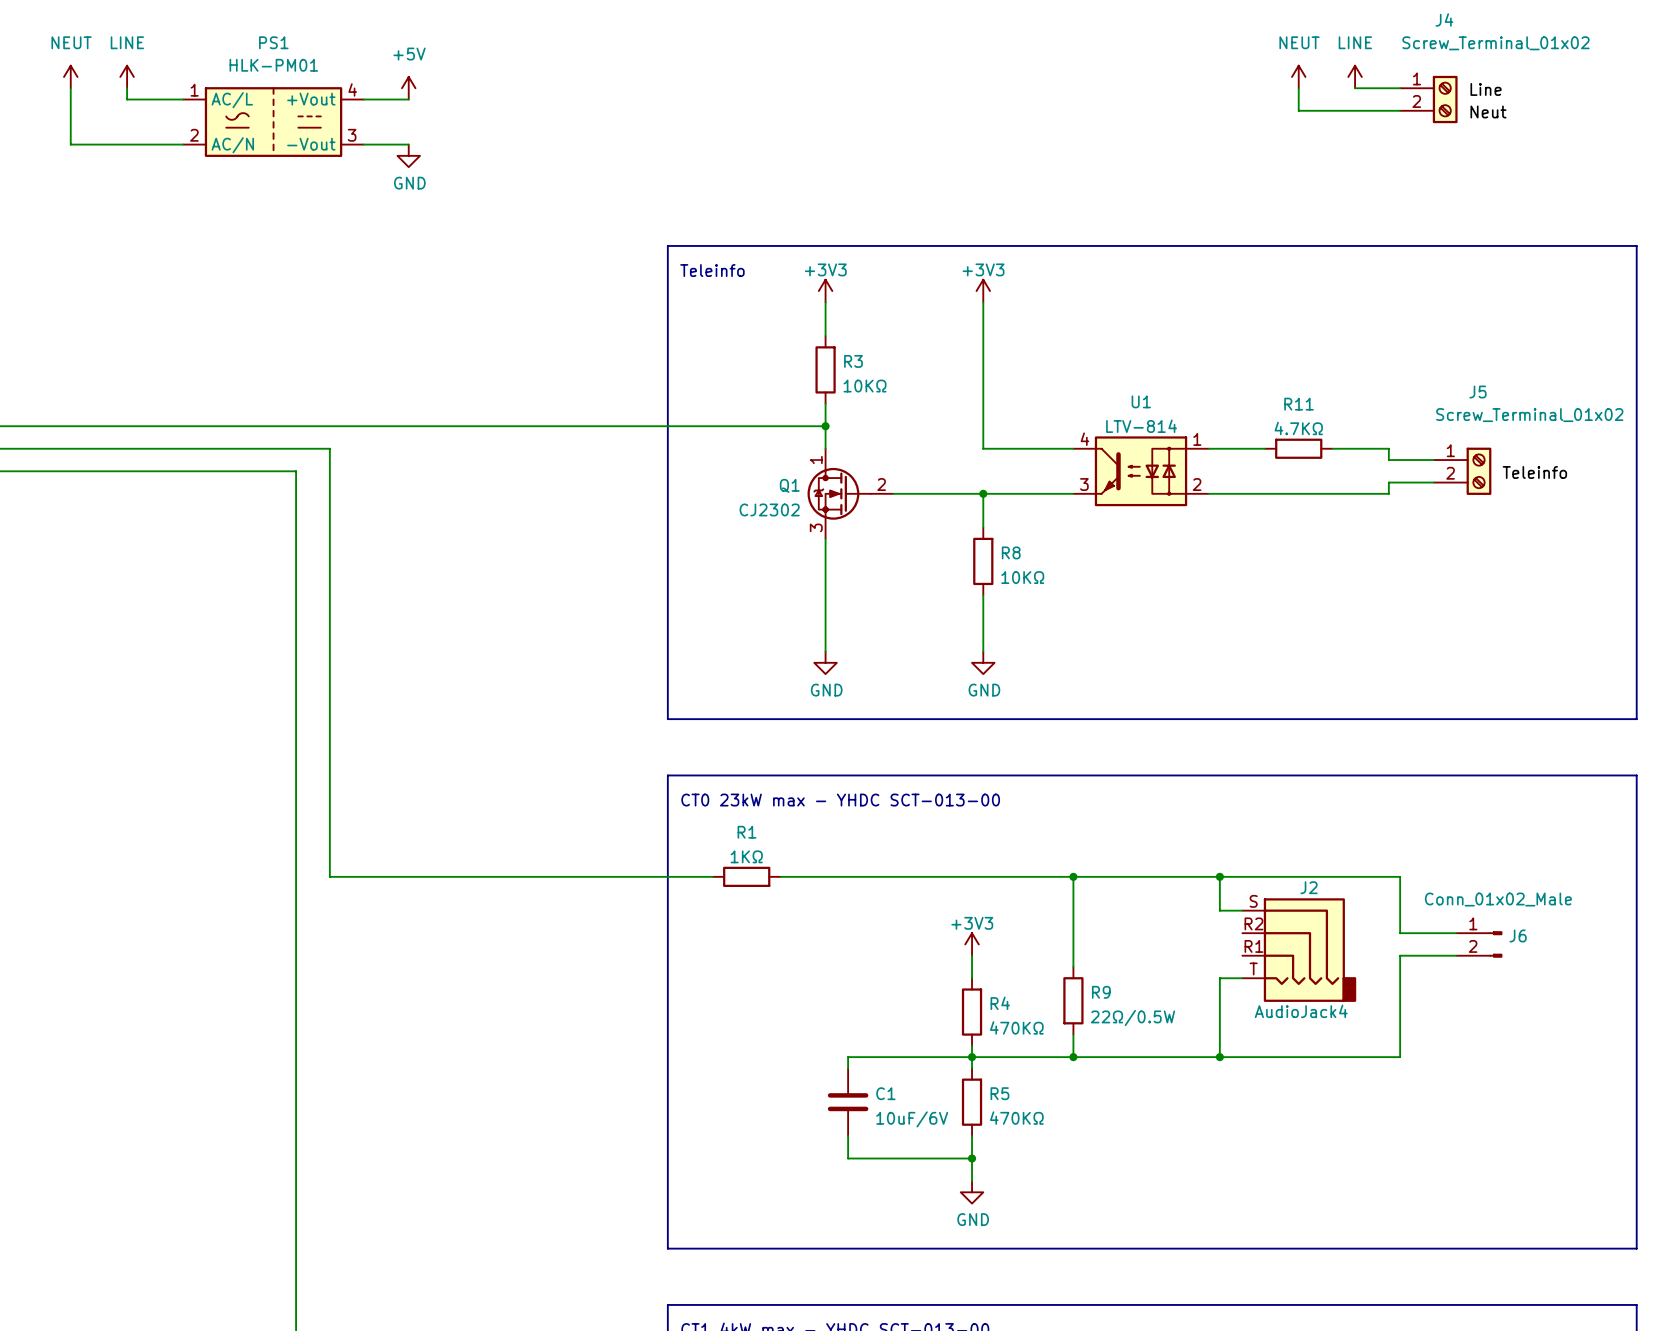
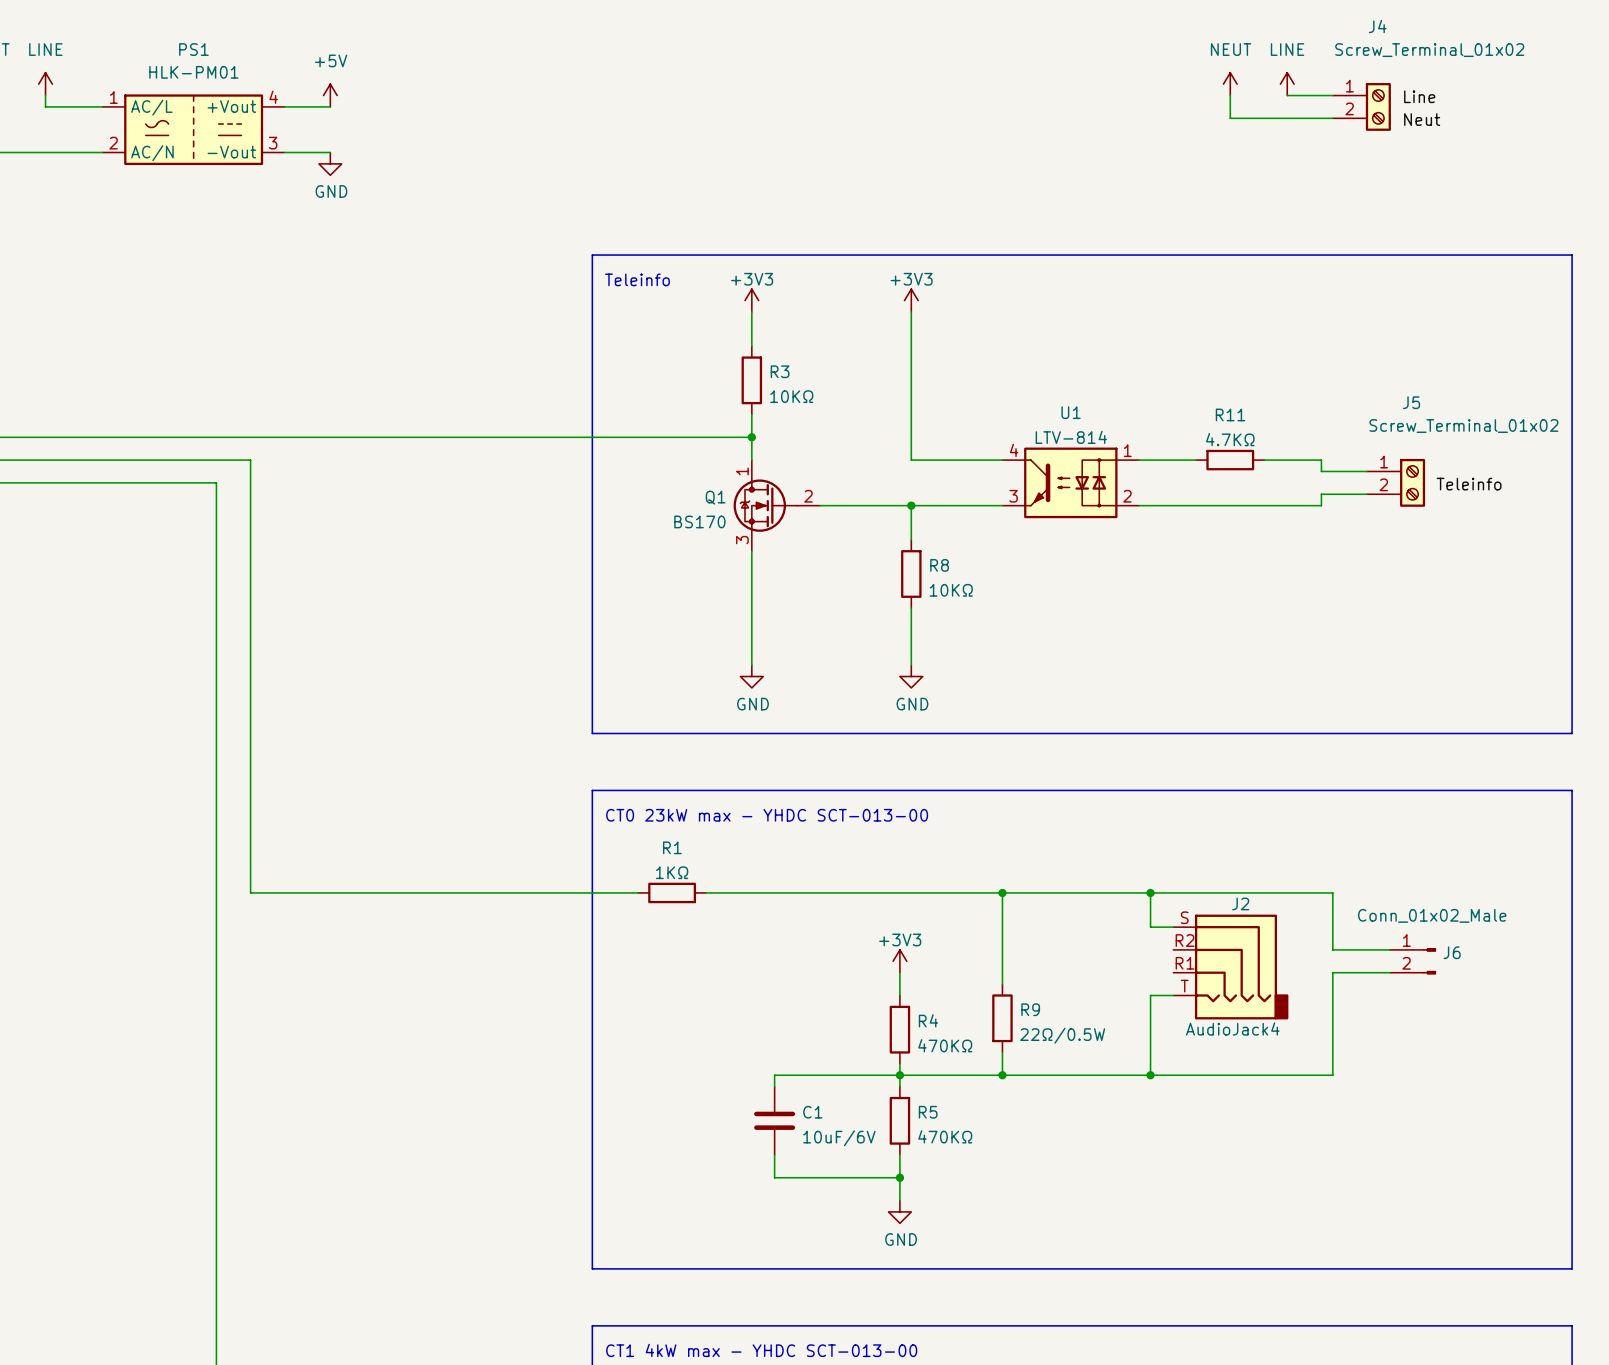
Q1 value: CJ2302 (769, 509) -> BS170 (699, 521)

